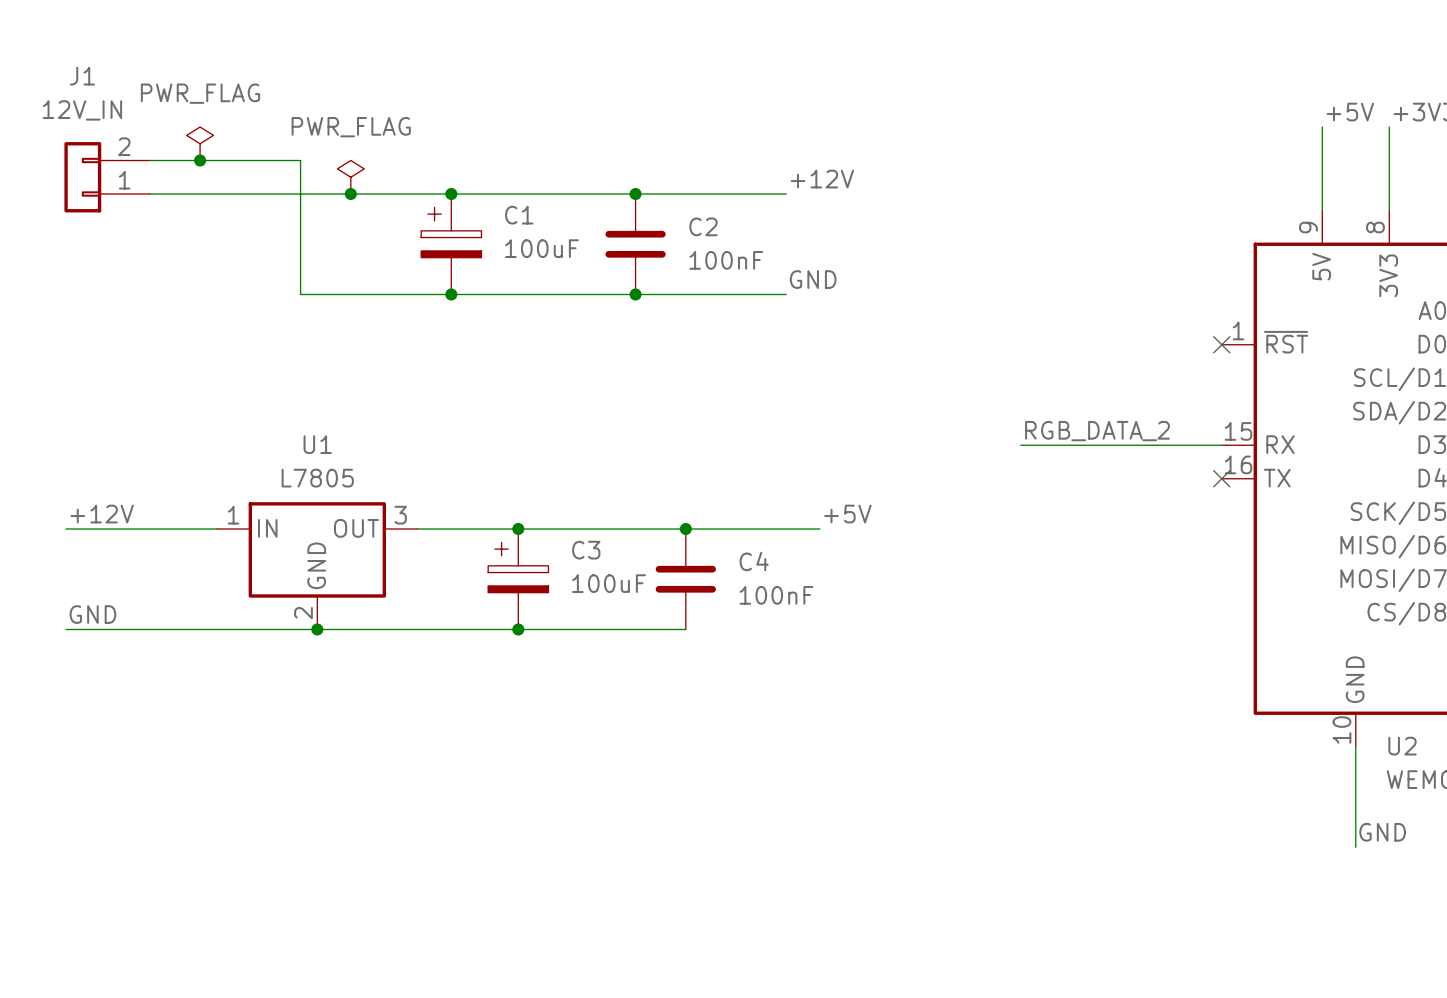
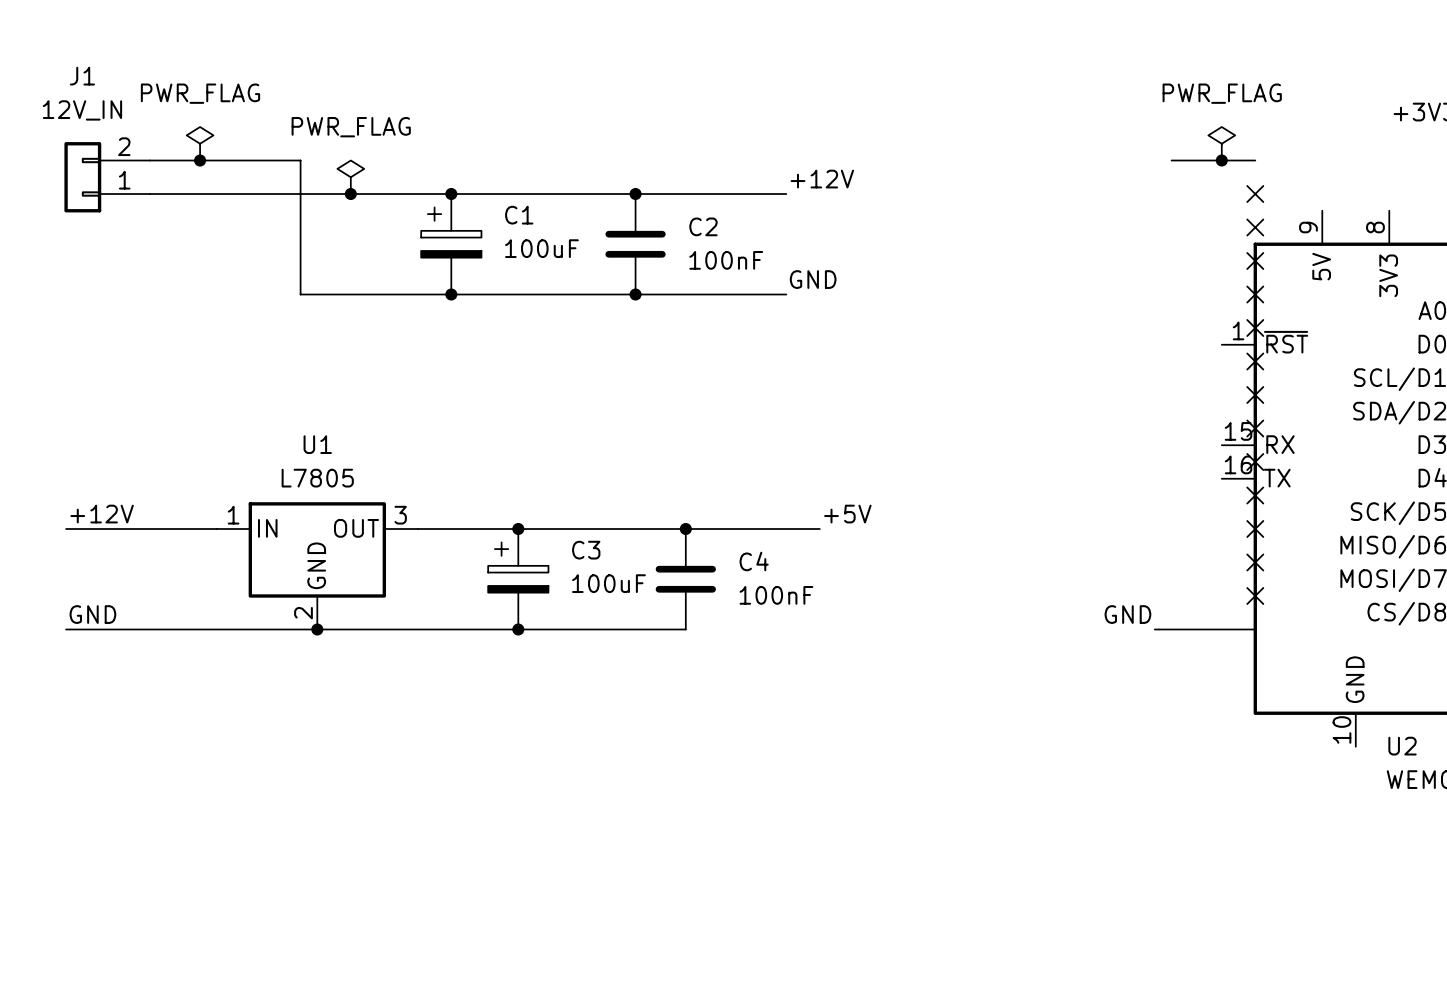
label: +5V (1350, 112) -> none
wire: (1322, 127) (1322, 210) -> none
wire: (1389, 127) (1389, 210) -> none
power symbol: none -> PWR_FLAG (1221, 143)
wire: none -> (1171, 160) (1255, 160)
junction: none -> (1221, 160)
no-connect mark: none -> (1255, 194)
no-connect mark: none -> (1255, 227)
no-connect mark: none -> (1255, 261)
no-connect mark: none -> (1255, 294)
no-connect mark: none -> (1255, 328)
no-connect mark: (1221, 344) -> none
no-connect mark: none -> (1255, 361)
no-connect mark: none -> (1255, 395)
no-connect mark: none -> (1255, 428)
label: RGB_DATA_2 (1097, 431) -> none
wire: (1020, 445) (1221, 445) -> none
no-connect mark: none -> (1255, 462)
no-connect mark: (1221, 478) -> none
no-connect mark: none -> (1255, 495)
no-connect mark: none -> (1255, 528)
no-connect mark: none -> (1255, 562)
no-connect mark: none -> (1255, 595)
wire: none -> (1154, 629) (1255, 629)
wire: (1355, 746) (1355, 847) -> none
label position: GND (1382, 832) -> GND (1127, 614)

